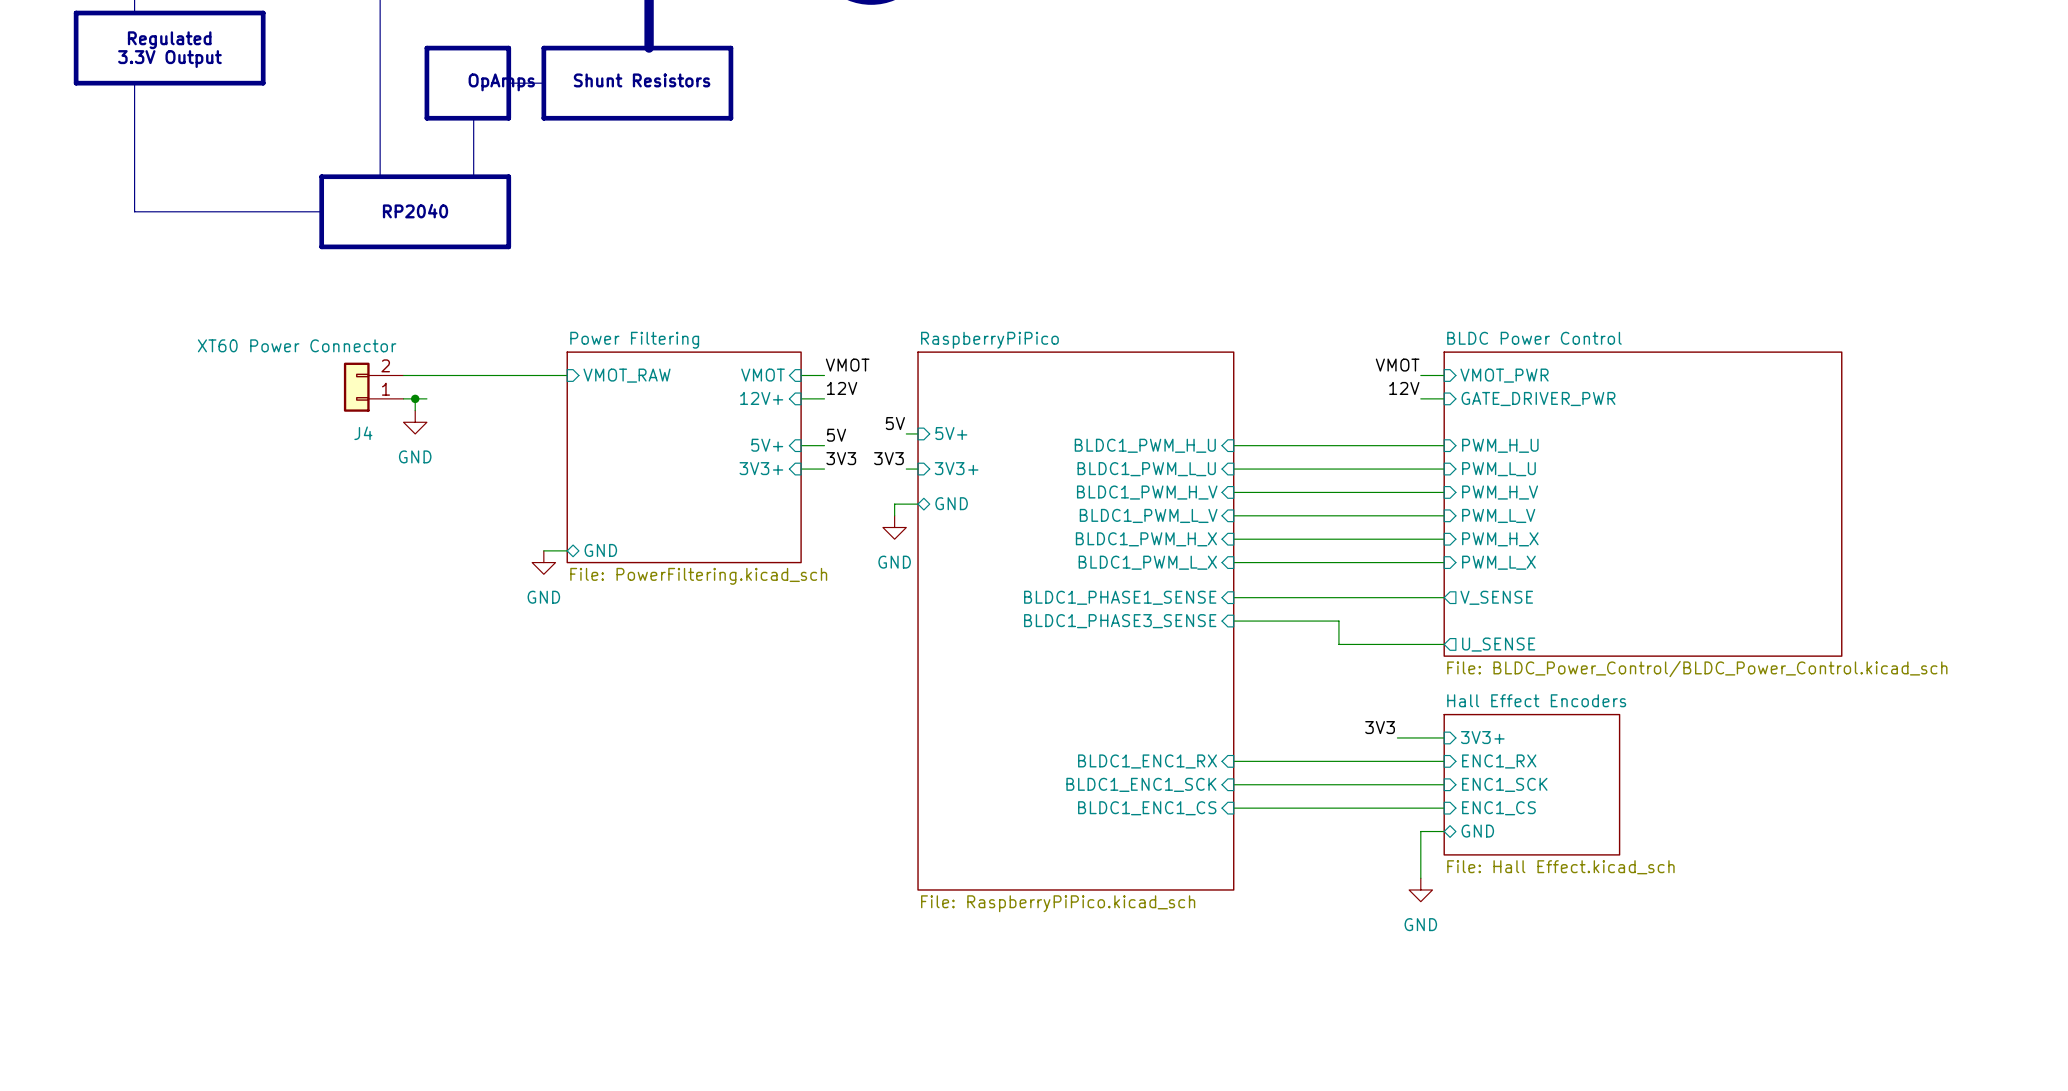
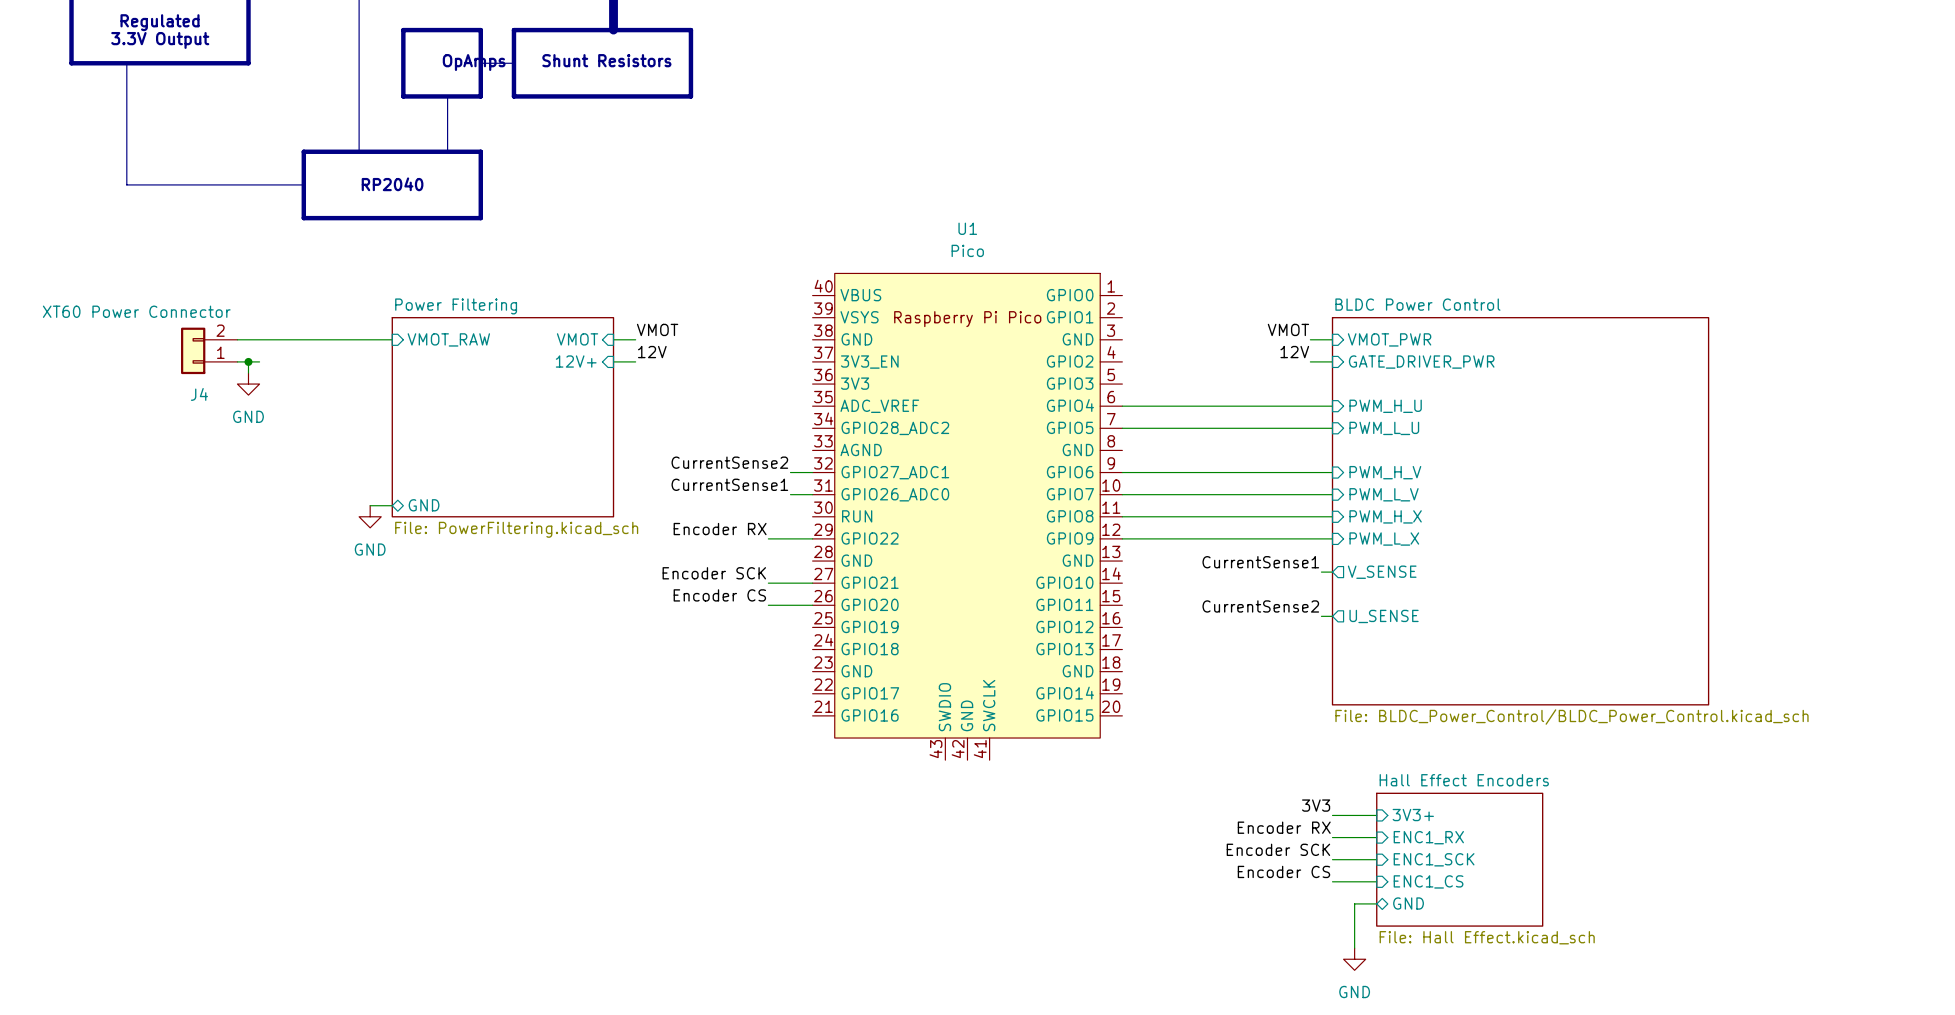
label position: VMOT (847, 365) -> VMOT (657, 329)
label position: VMOT (1397, 365) -> VMOT (1288, 329)
wire: (415, 375) (567, 375) -> (237, 339) (381, 339)
sheet pin position: VMOT_RAW (626, 375) -> VMOT_RAW (448, 339)
sheet pin position: VMOT (763, 375) -> VMOT (577, 339)
wire: (801, 375) (824, 375) -> (613, 339) (635, 339)
wire: (1420, 375) (1444, 375) -> (1310, 339) (1332, 339)
sheet pin position: VMOT_PWR (1504, 375) -> VMOT_PWR (1389, 339)
J4 position: (373, 387) -> (209, 350)
label position: 12V (842, 388) -> 12V (652, 352)
label position: 12V (1404, 388) -> 12V (1294, 352)
junction: none -> (248, 361)
wire: (403, 398) (426, 398) -> (237, 361) (259, 361)
junction: (415, 398) -> none
sheet pin position: 12V+ (761, 398) -> 12V+ (576, 361)
wire: (801, 398) (824, 398) -> (613, 361) (635, 361)
wire: (1420, 398) (1444, 398) -> (1310, 361) (1332, 361)
sheet pin position: GATE_DRIVER_PWR (1538, 399) -> GATE_DRIVER_PWR (1421, 362)
power symbol: none -> GND (248, 384)
power symbol: GND (415, 422) -> none
label: 5V (895, 423) -> none
sheet pin: 5V+ (951, 433) -> none
label: 5V (836, 435) -> none
sheet pin: 5V+ (767, 445) -> none
wire: (801, 445) (824, 445) -> (790, 472) (812, 472)
sheet pin: BLDC1_PWM_H_U (1145, 445) -> none
wire: none -> (1122, 406) (1166, 406)
wire: (1409, 445) (1444, 445) -> none
sheet pin position: PWM_H_U (1500, 445) -> PWM_H_U (1385, 406)
sheet Power Filtering position: (684, 457) -> (502, 417)
label: 3V3 (841, 458) -> none
label: 3V3 (888, 458) -> none
sheet pin: 3V3+ (761, 468) -> none
sheet pin: 3V3+ (956, 468) -> none
wire: (801, 469) (824, 469) -> (790, 494) (812, 494)
sheet pin: BLDC1_PWM_L_U (1146, 469) -> none
wire: none -> (1122, 428) (1166, 428)
wire: (1409, 469) (1444, 469) -> none
sheet pin position: PWM_L_U (1498, 469) -> PWM_L_U (1384, 428)
sheet pin: BLDC1_PWM_H_V (1147, 492) -> none
wire: (1233, 492) (1444, 492) -> none
sheet pin position: PWM_H_V (1500, 492) -> PWM_H_V (1385, 472)
sheet pin: GND (951, 503) -> none
sheet BLDC Power Control: File: BLDC_Power_Control/BLDC_Power_Control.kicad_sch (1642, 504) -> none
label: none -> CurrentSense2 (729, 462)
sheet pin: BLDC1_PWM_L_V (1148, 515) -> none
wire: none -> (1122, 472) (1166, 472)
wire: (1409, 515) (1444, 515) -> none
sheet pin position: PWM_L_V (1498, 515) -> PWM_L_V (1384, 494)
power symbol: GND (894, 527) -> none
label: none -> CurrentSense1 (729, 484)
sheet pin: BLDC1_PWM_H_X (1146, 539) -> none
wire: none -> (1122, 494) (1166, 494)
wire: (1409, 539) (1444, 539) -> none
sheet pin position: PWM_H_X (1500, 539) -> PWM_H_X (1385, 516)
wire: (543, 550) (567, 550) -> (370, 505) (392, 505)
sheet pin position: GND (600, 550) -> GND (424, 505)
sheet BLDC Power Control: none -> File: BLDC_Power_Control/BLDC_Power_Control.kicad_sch (1520, 511)
power symbol: none -> GND (370, 516)
power symbol: GND (543, 562) -> none
U1: none -> Pico (967, 516)
sheet pin: BLDC1_PWM_L_X (1147, 562) -> none
wire: none -> (1122, 516) (1166, 516)
wire: (1409, 562) (1444, 562) -> none
sheet pin position: PWM_L_X (1498, 562) -> PWM_L_X (1384, 539)
label: none -> Encoder RX (720, 529)
wire: none -> (768, 538) (812, 538)
wire: none -> (1122, 538) (1332, 538)
sheet pin: BLDC1_PHASE1_SENSE (1120, 597) -> none
wire: (1233, 597) (1444, 597) -> none
sheet pin position: V_SENSE (1496, 597) -> V_SENSE (1382, 572)
label: none -> CurrentSense1 (1260, 562)
sheet RaspberryPiPico: File: RaspberryPiPico.kicad_sch (1075, 621) -> none
sheet pin: BLDC1_PHASE3_SENSE (1120, 621) -> none
wire: (1233, 621) (1338, 621) (1338, 644) (1444, 644) -> none
wire: none -> (1321, 572) (1332, 572)
label: none -> Encoder SCK (714, 573)
wire: none -> (768, 583) (812, 583)
sheet pin position: U_SENSE (1498, 644) -> U_SENSE (1384, 616)
label: none -> Encoder CS (719, 595)
wire: none -> (768, 605) (812, 605)
label: none -> CurrentSense2 (1260, 606)
wire: none -> (1321, 616) (1332, 616)
label position: 3V3 (1380, 727) -> 3V3 (1316, 805)
wire: (1397, 737) (1444, 737) -> (1332, 815) (1376, 815)
sheet pin position: 3V3+ (1482, 737) -> 3V3+ (1413, 815)
sheet pin: BLDC1_ENC1_RX (1147, 761) -> none
wire: (1233, 761) (1444, 761) -> none
sheet pin position: ENC1_RX (1499, 761) -> ENC1_RX (1428, 837)
sheet pin: BLDC1_ENC1_SCK (1141, 784) -> none
wire: (1233, 784) (1444, 784) -> none
sheet pin position: ENC1_SCK (1504, 784) -> ENC1_SCK (1434, 859)
sheet Hall Effect Encoders position: (1531, 784) -> (1459, 859)
sheet pin: BLDC1_ENC1_CS (1147, 808) -> none
wire: (1233, 808) (1444, 808) -> none
sheet pin position: ENC1_CS (1498, 808) -> ENC1_CS (1428, 881)
wire: (1444, 831) (1420, 831) (1420, 878) -> (1376, 903) (1354, 903) (1354, 948)
sheet pin position: GND (1477, 831) -> GND (1408, 903)
power symbol position: GND (1420, 889) -> GND (1354, 959)
label: none -> Encoder RX (1284, 827)
wire: none -> (1332, 837) (1376, 837)
label: none -> Encoder SCK (1278, 849)
wire: none -> (1332, 859) (1376, 859)
label: none -> Encoder CS (1283, 871)
wire: none -> (1332, 881) (1376, 881)

